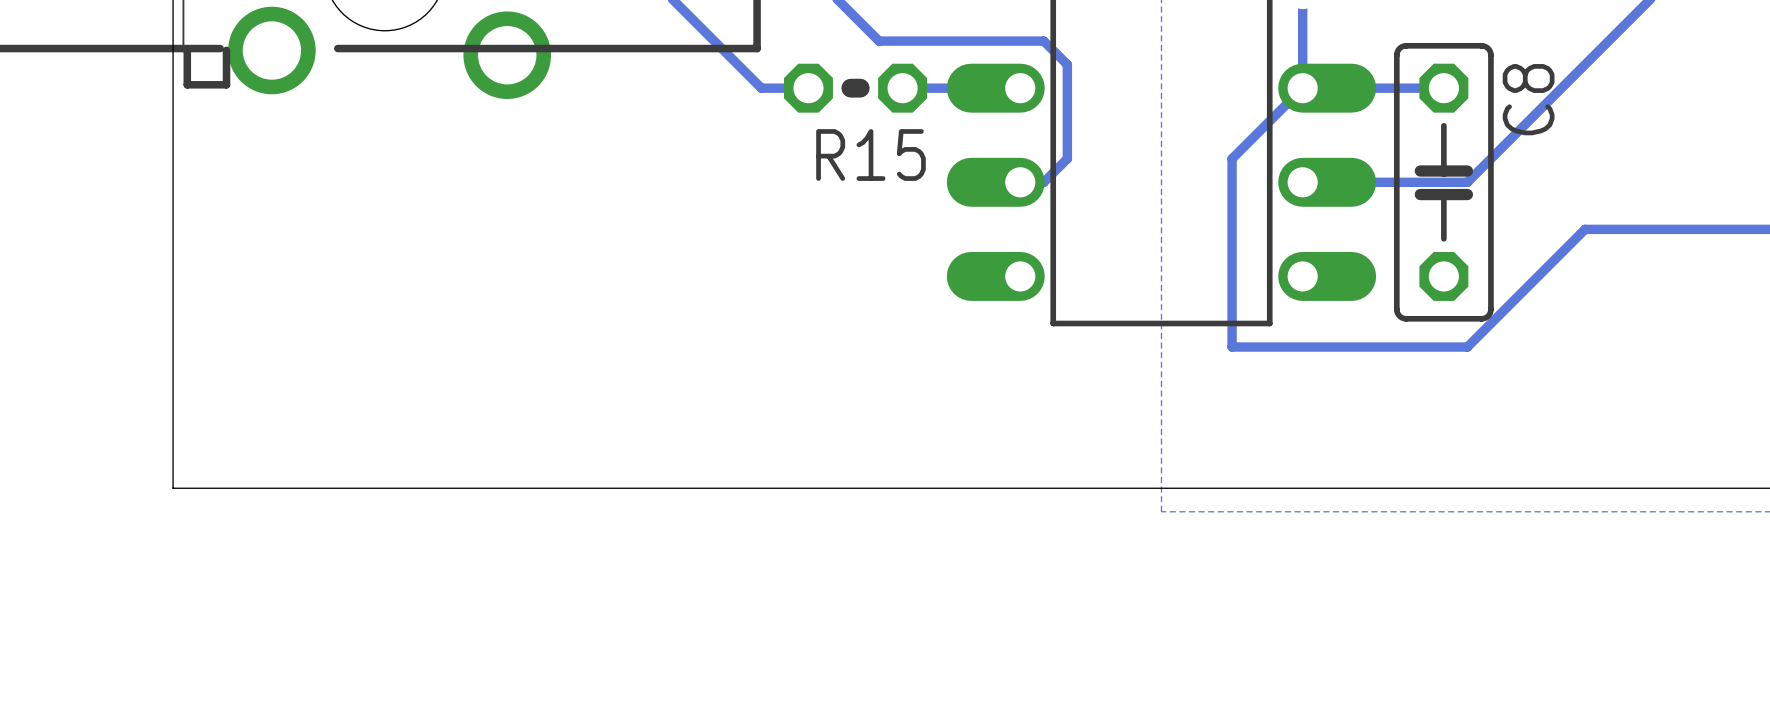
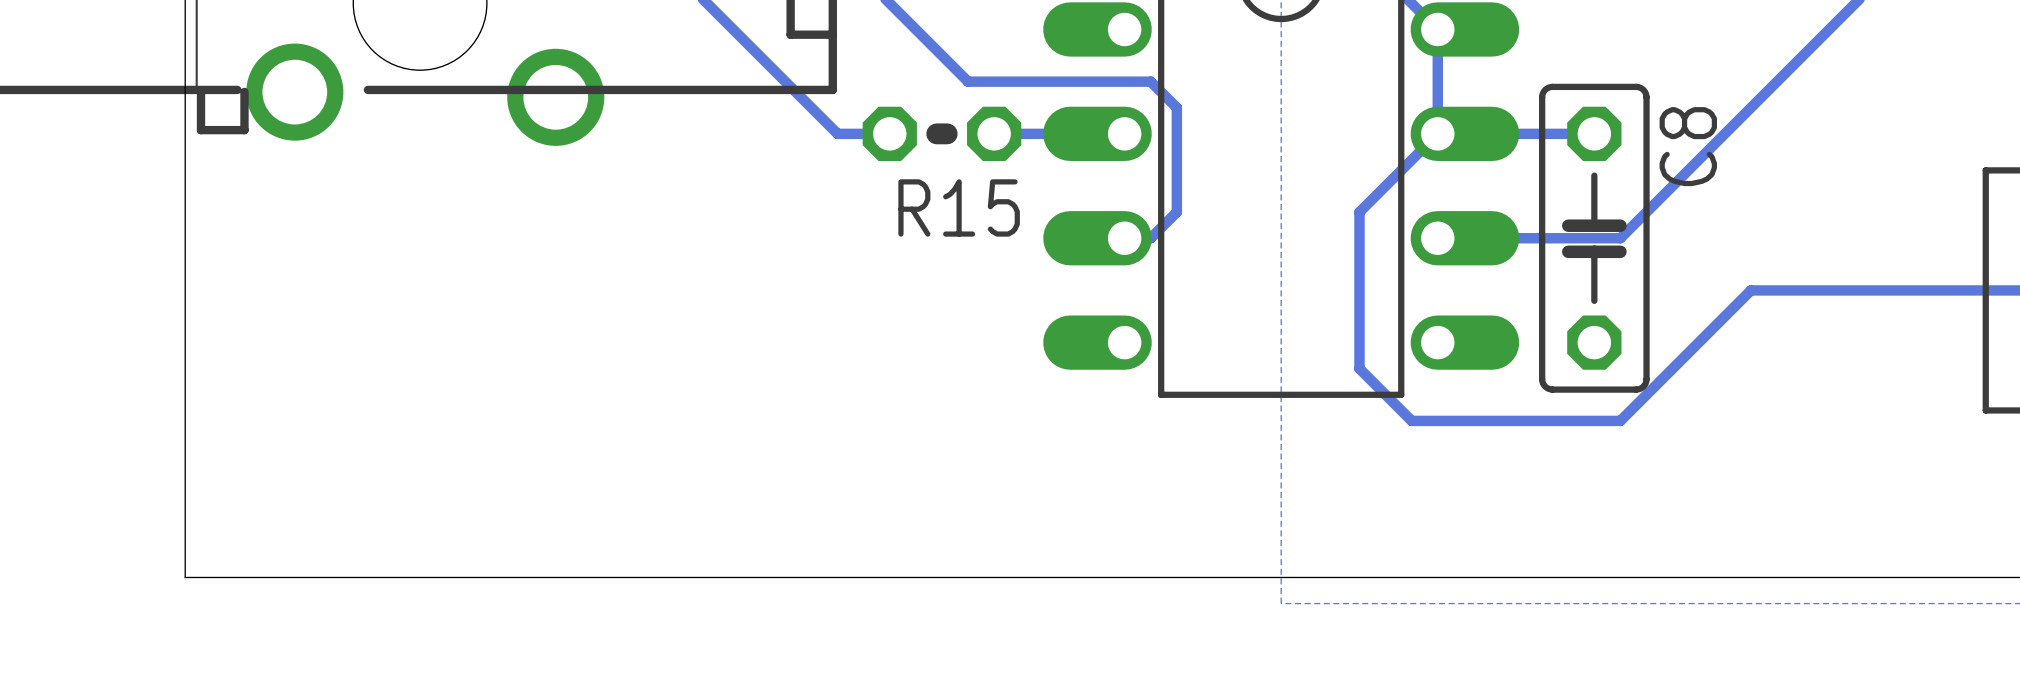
bottom track: (1232, 299) (1232, 347) (1279, 347) -> (1359, 368) (1411, 420)

